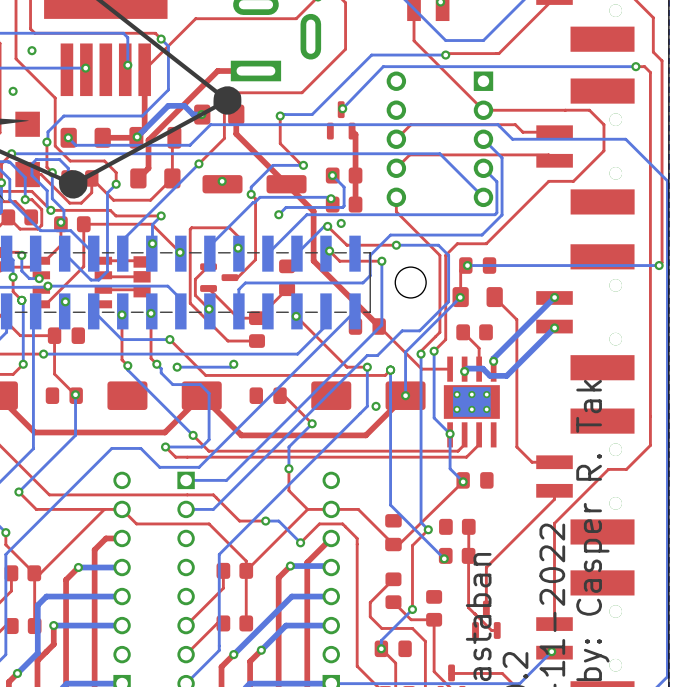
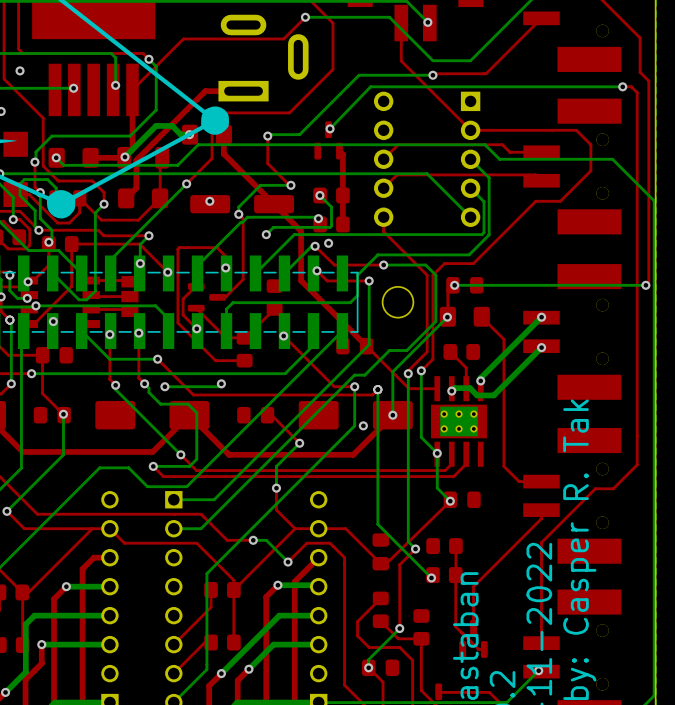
via: none -> (28, 281)

